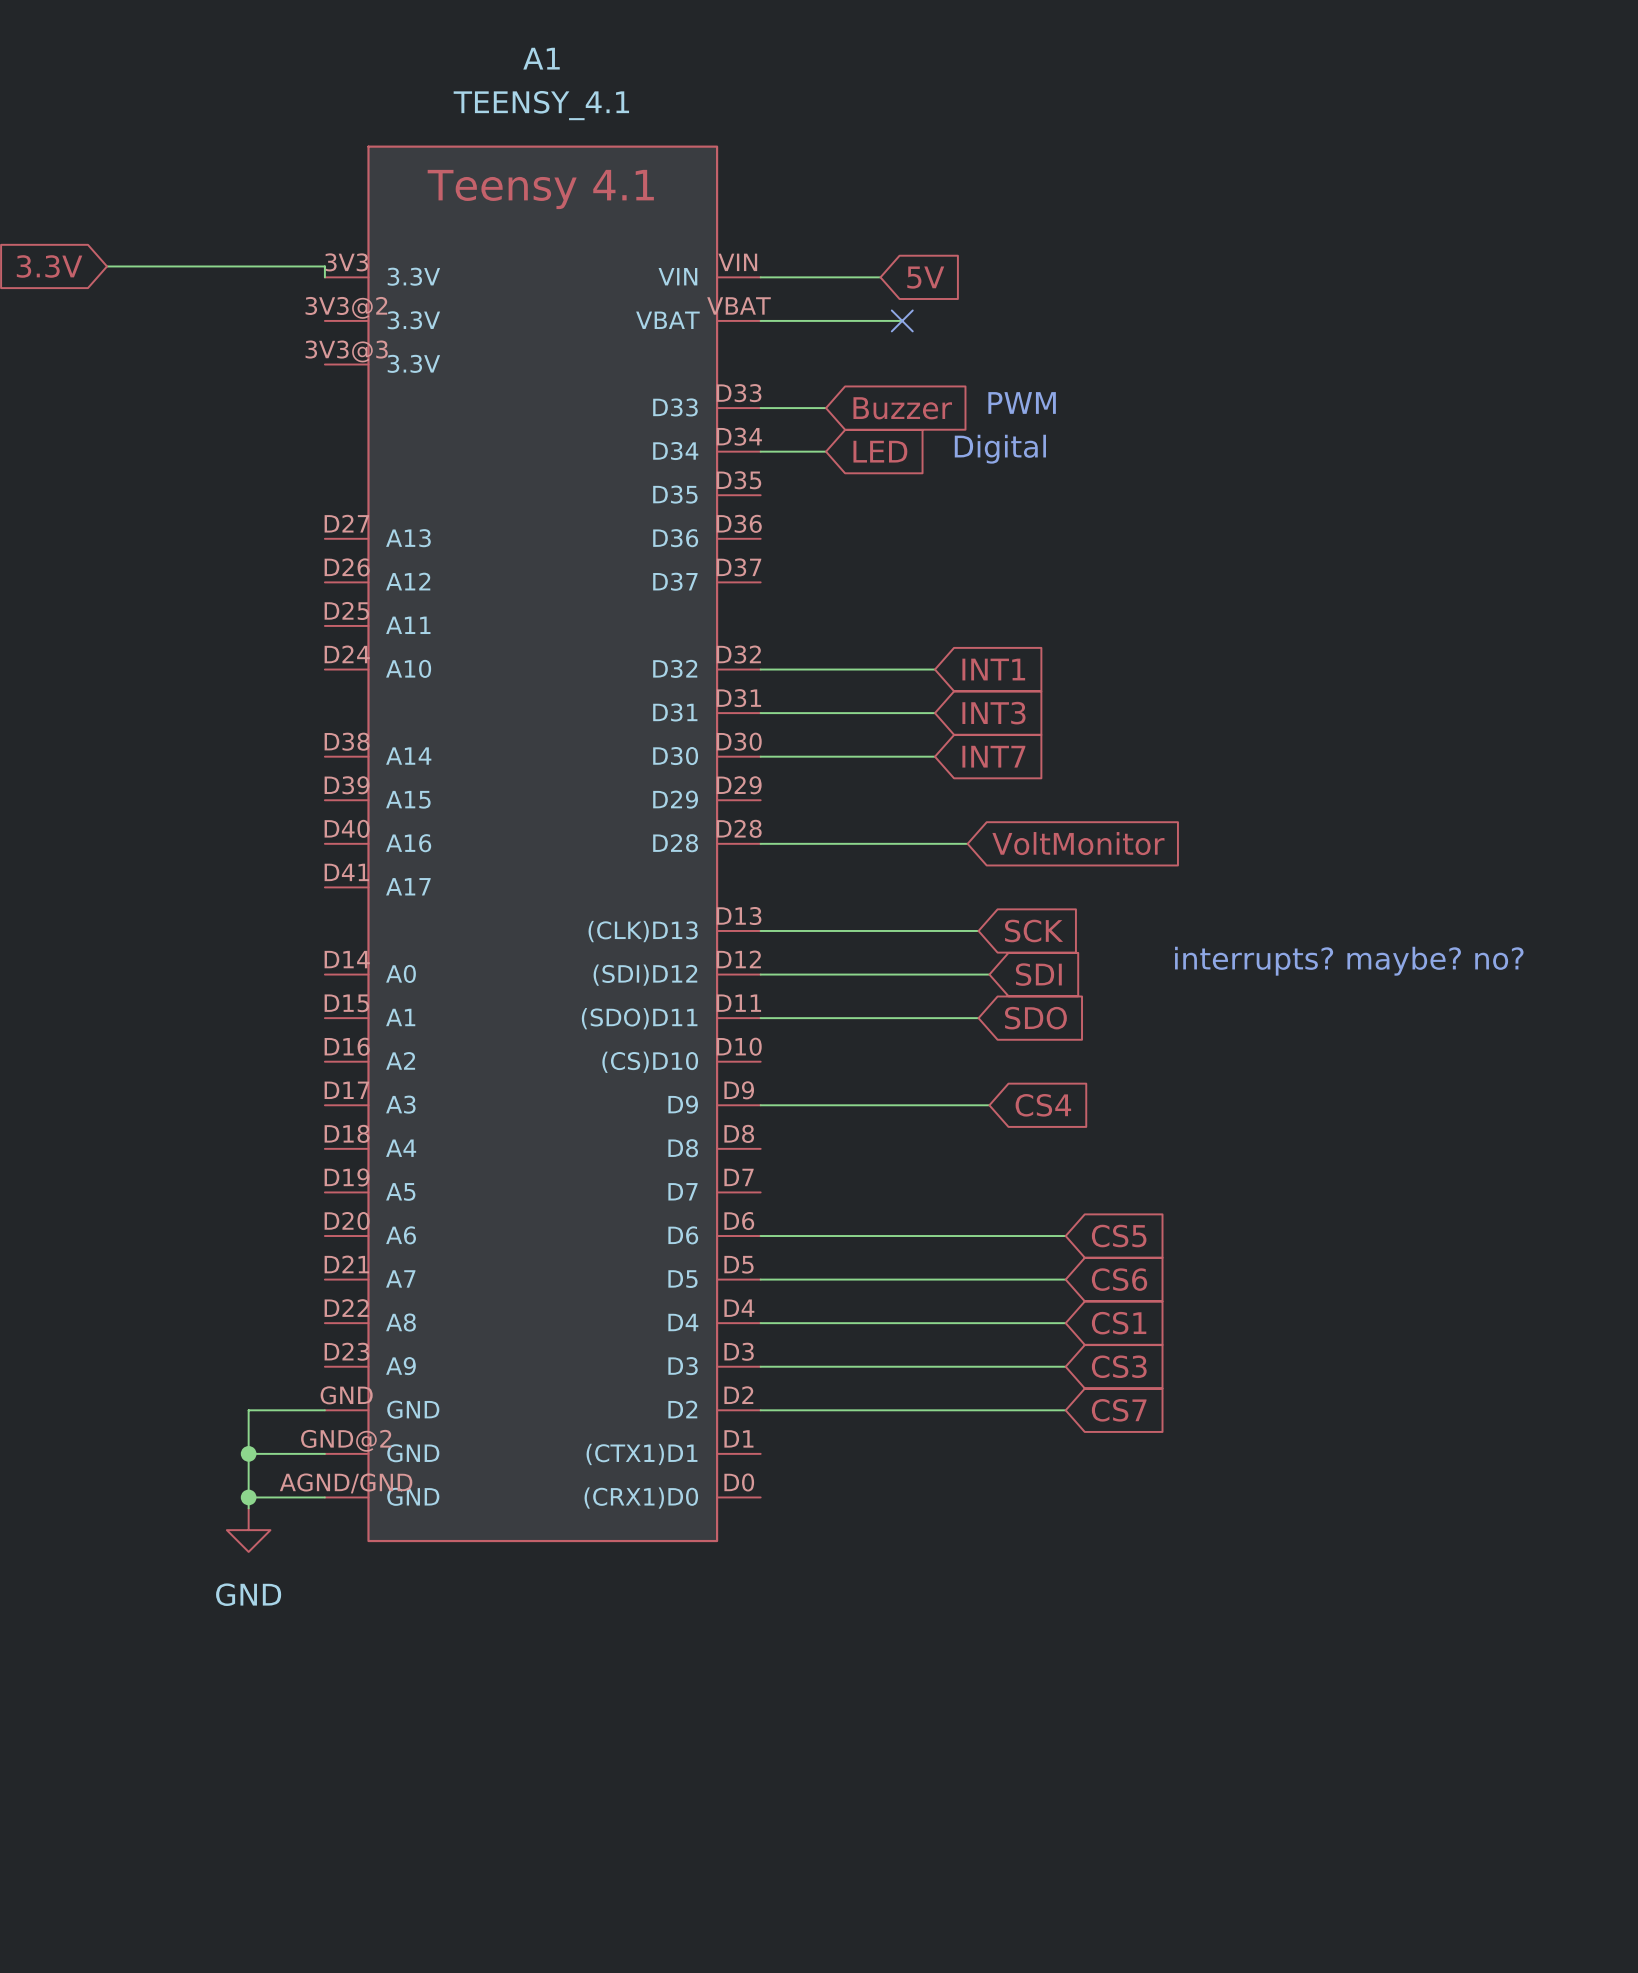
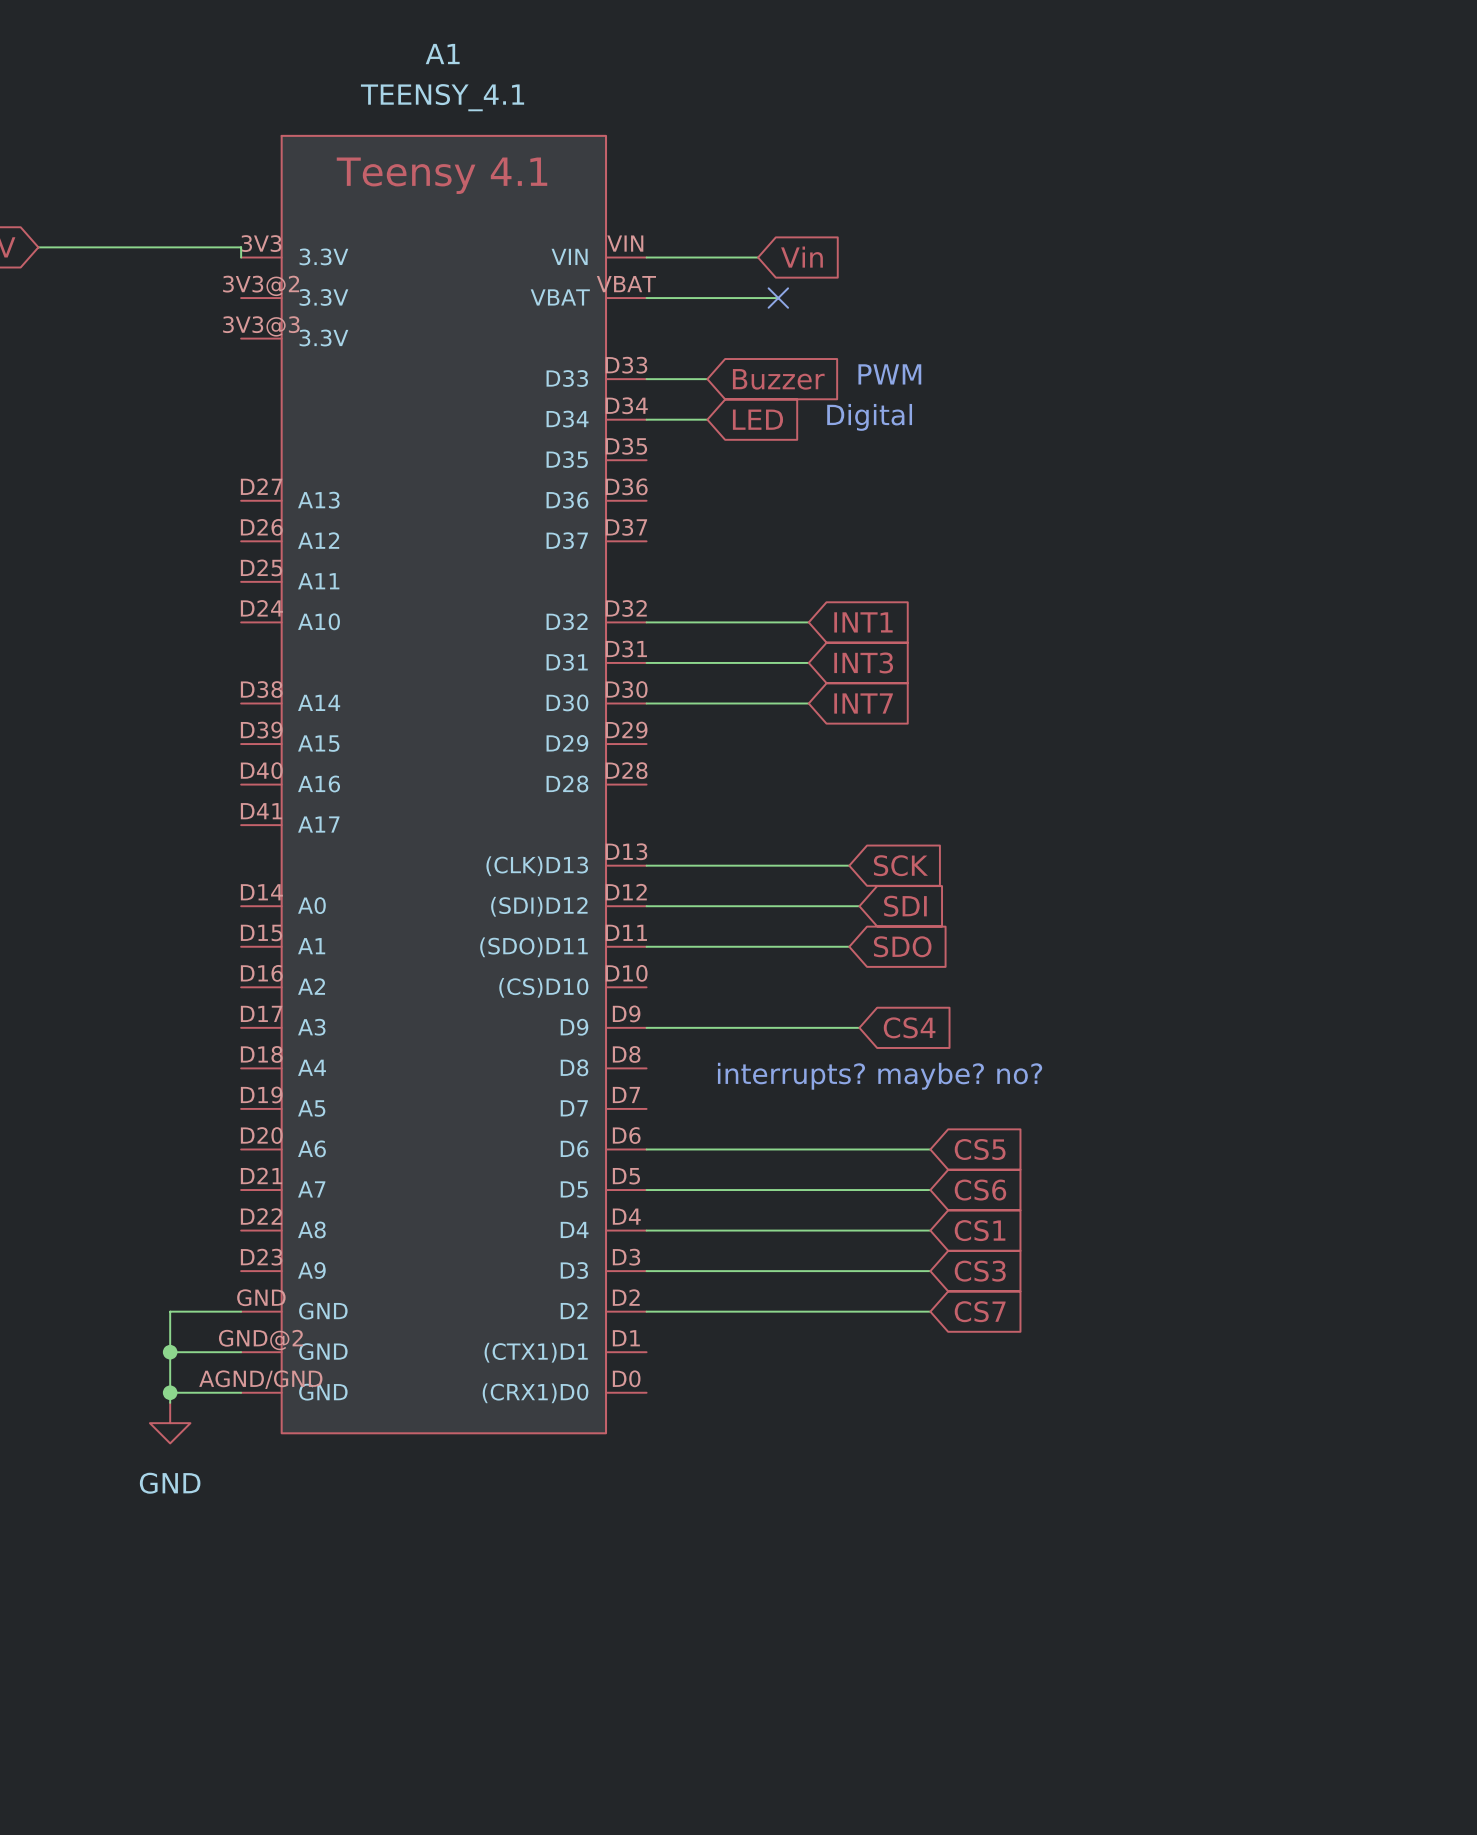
global label: 5V (925, 277) -> Vin (801, 257)
wire: (760, 843) (967, 843) -> none
global label: VoltMonitor (1078, 843) -> none
text position: interrupts? maybe? no? (1349, 961) -> interrupts? maybe? no? (880, 1076)

